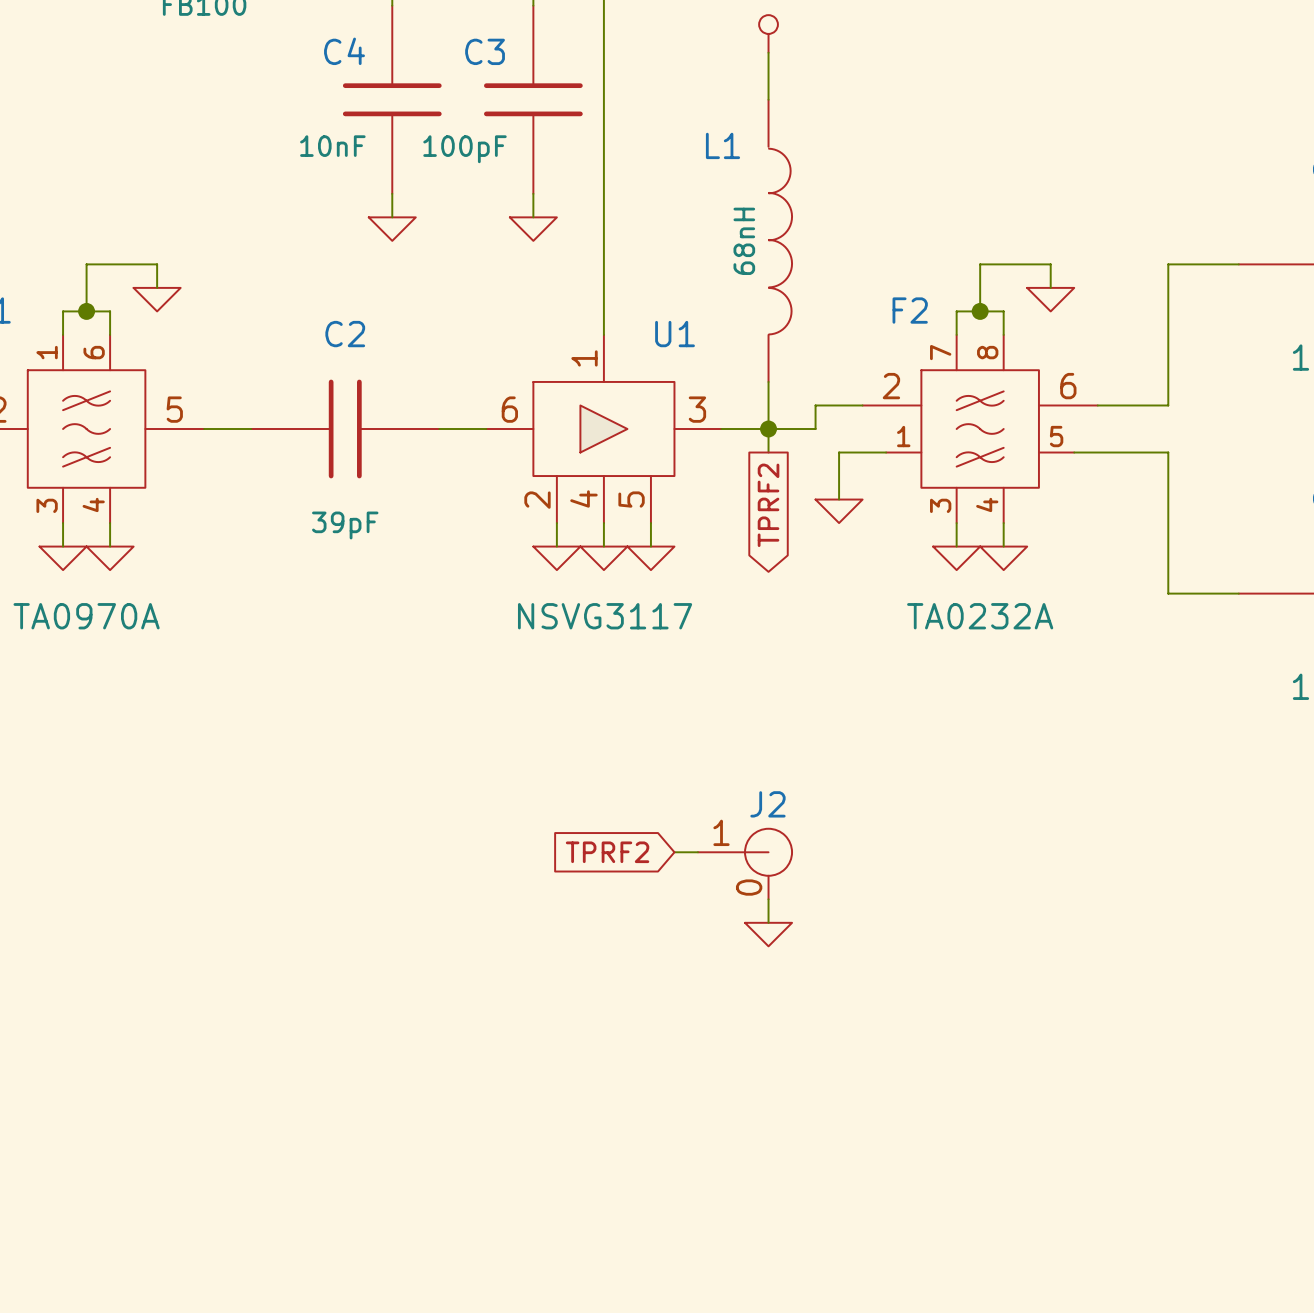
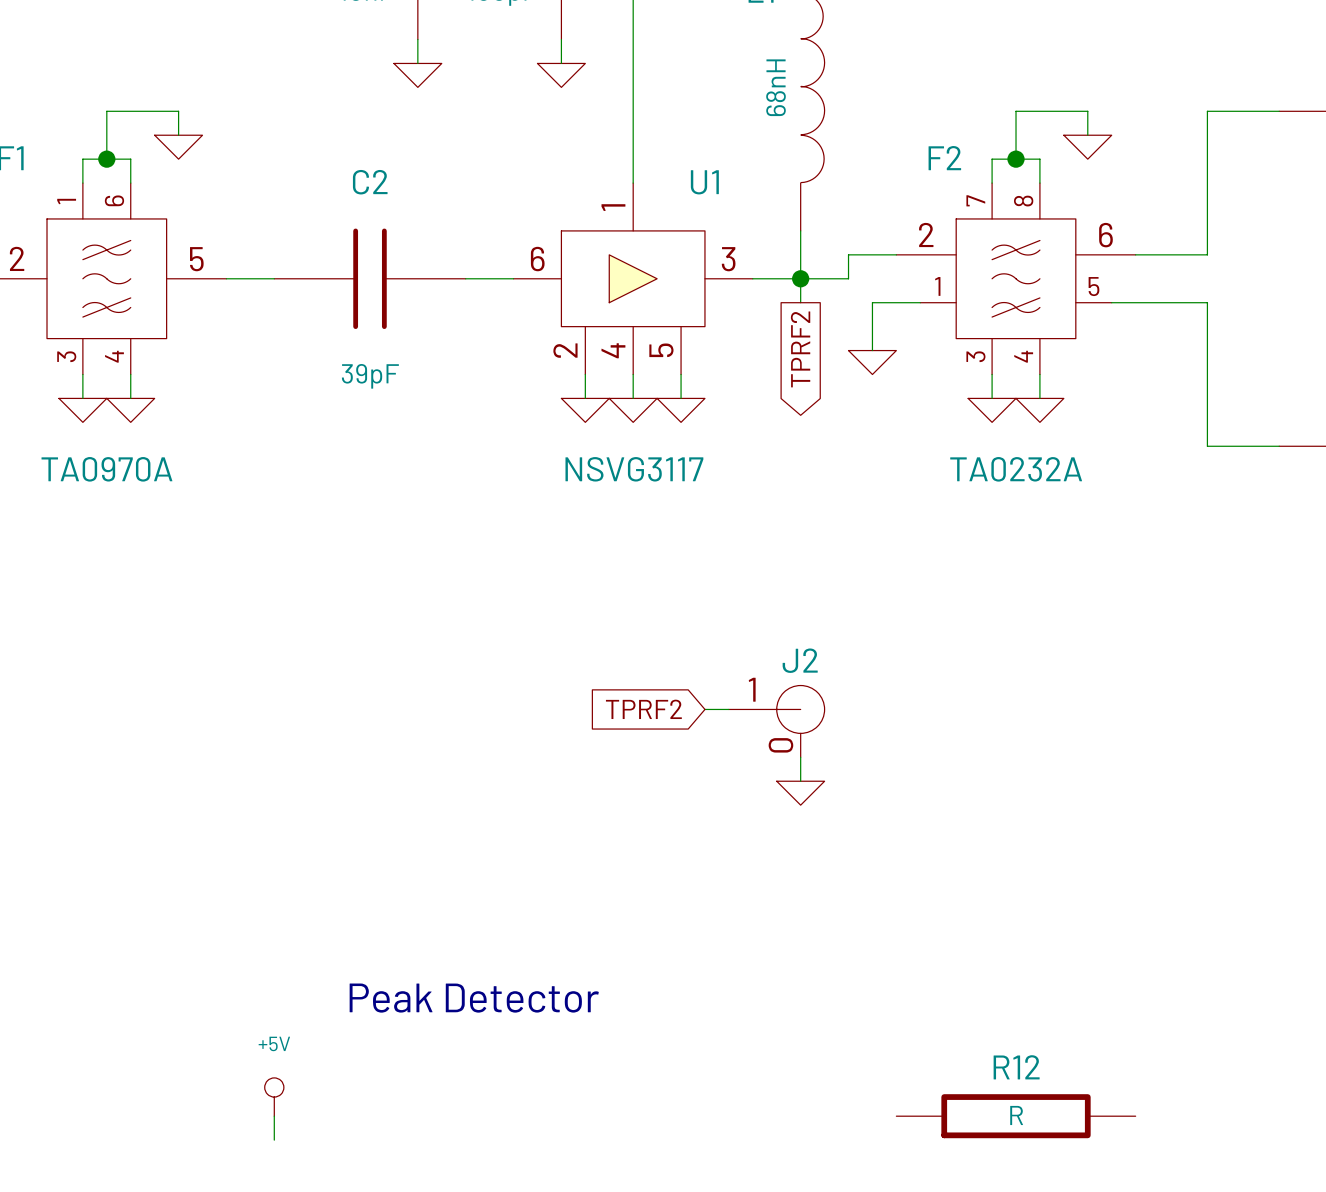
text: none -> Peak Detector (474, 998)
power symbol: none -> +5V (274, 1097)
wire: none -> (274, 1116) (274, 1140)
R12: none -> R (1016, 1116)

